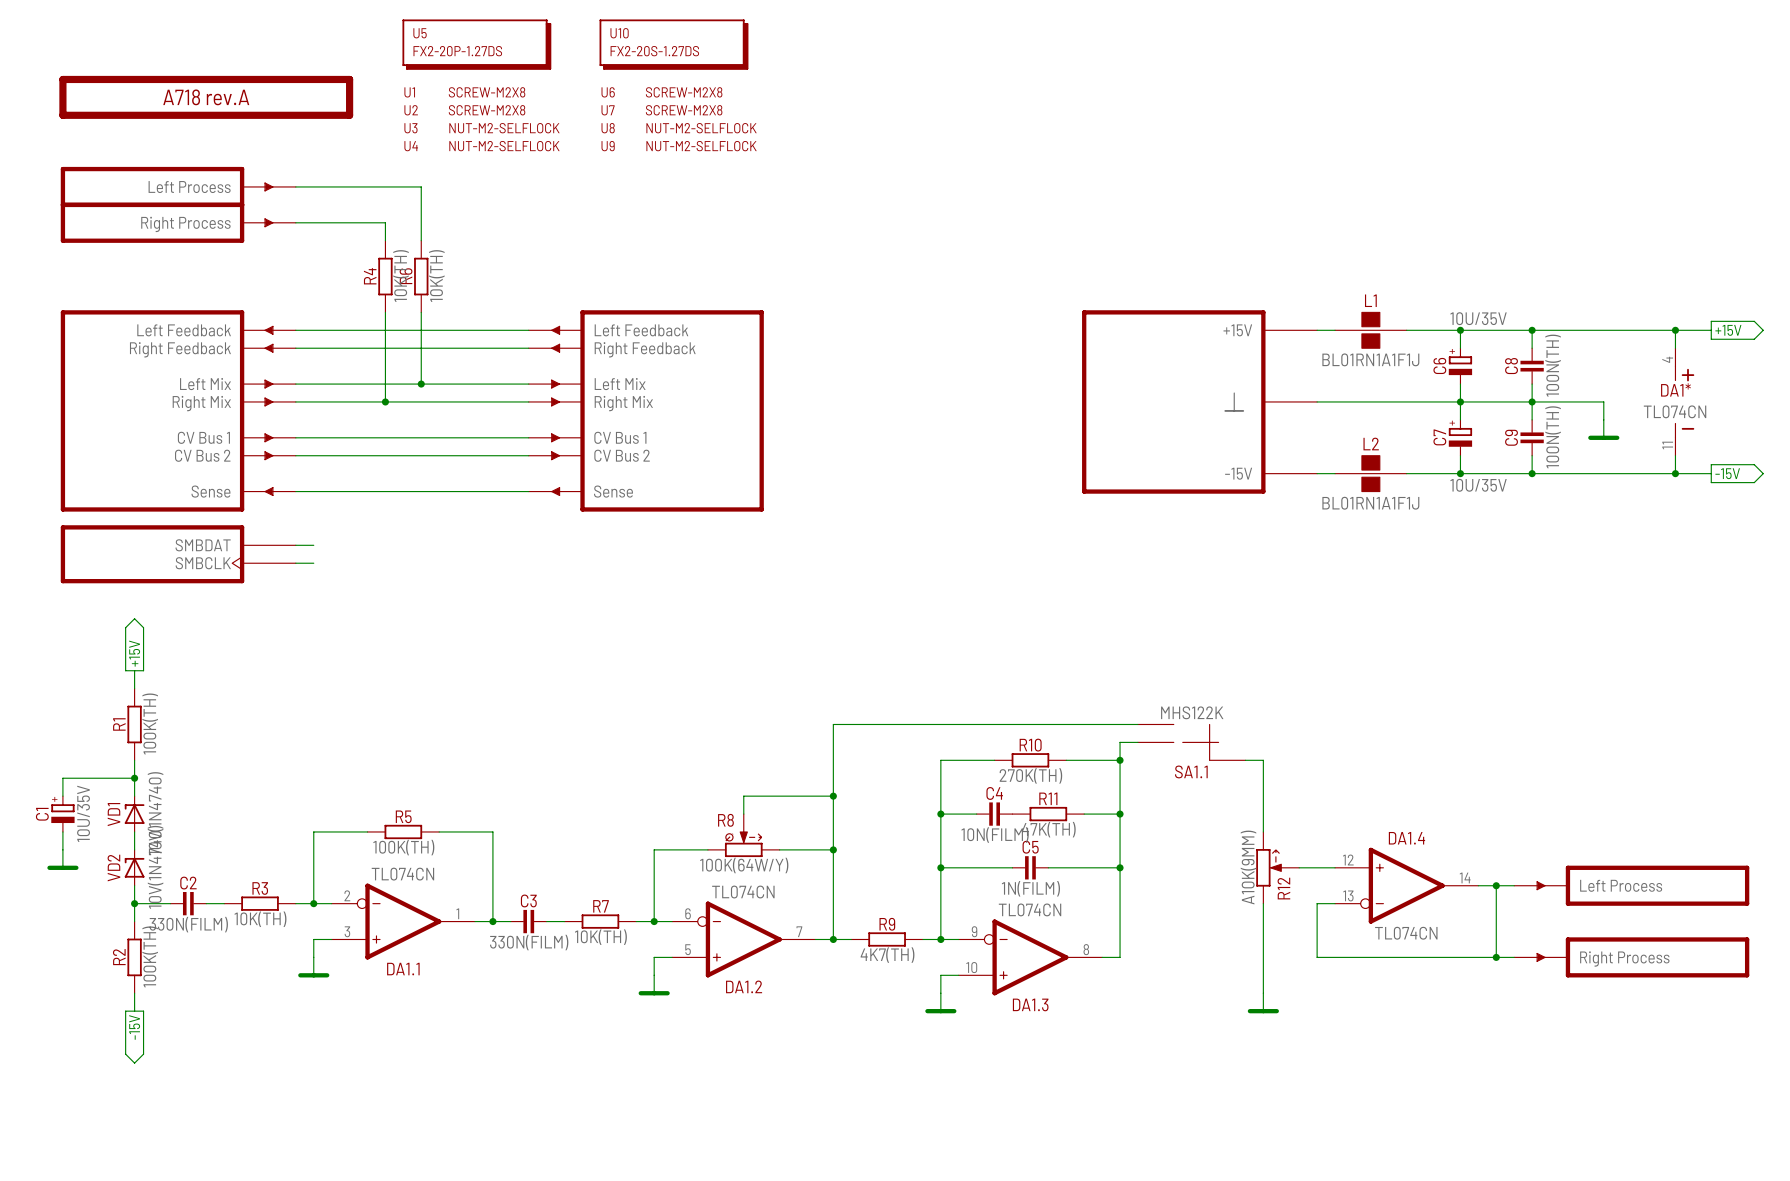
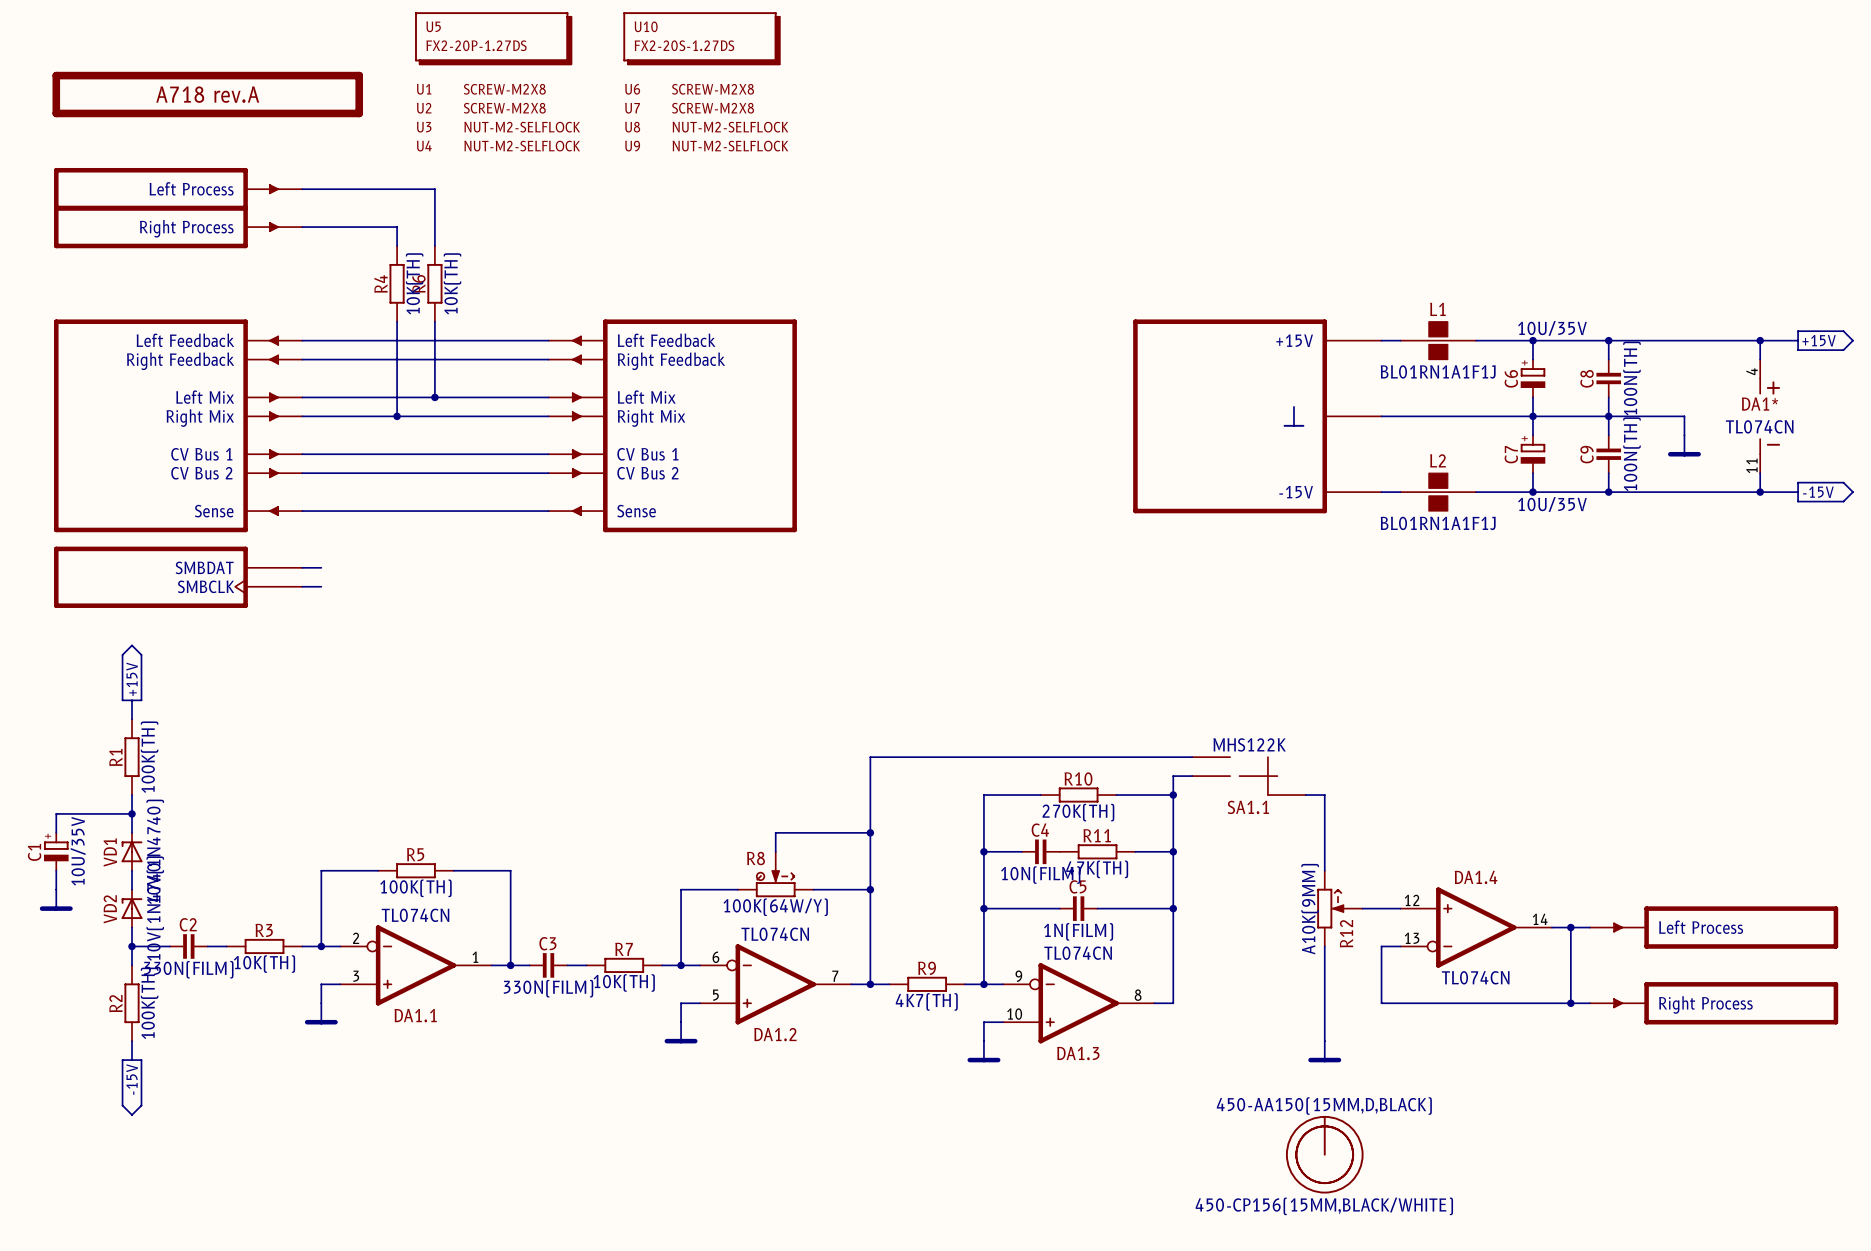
part: none -> 450-AA150(15MM,D,BLACK) (1324, 1154)
part: none -> 450-CP156(15MM,BLACK/WHITE) (1324, 1154)

